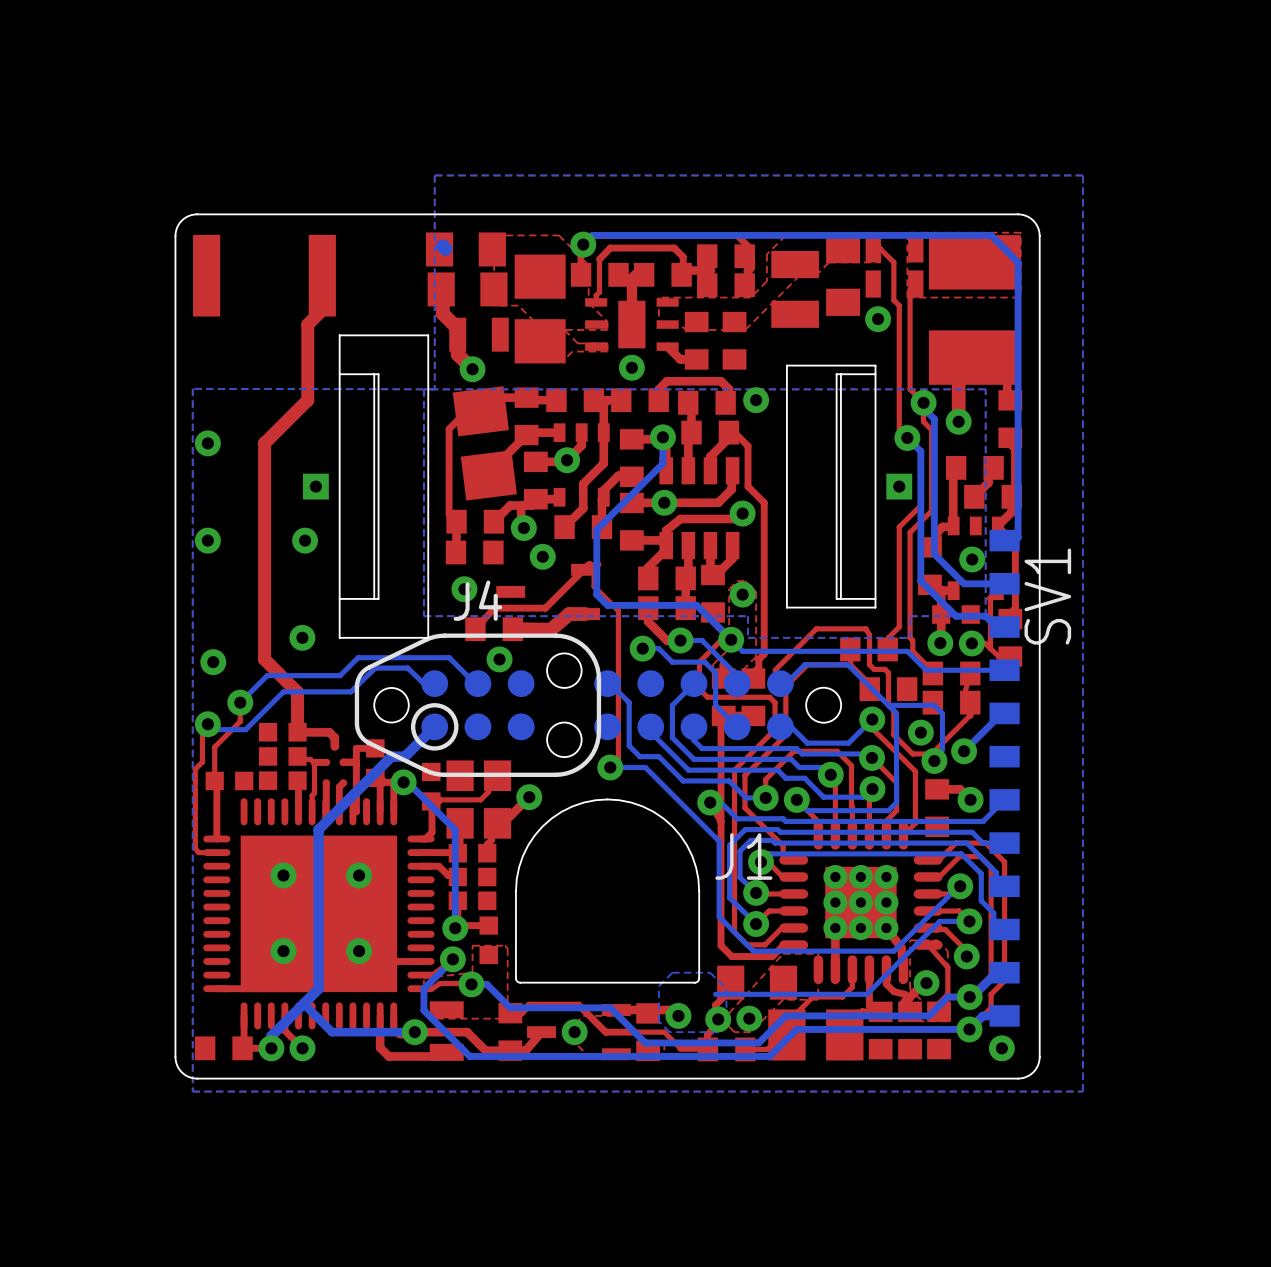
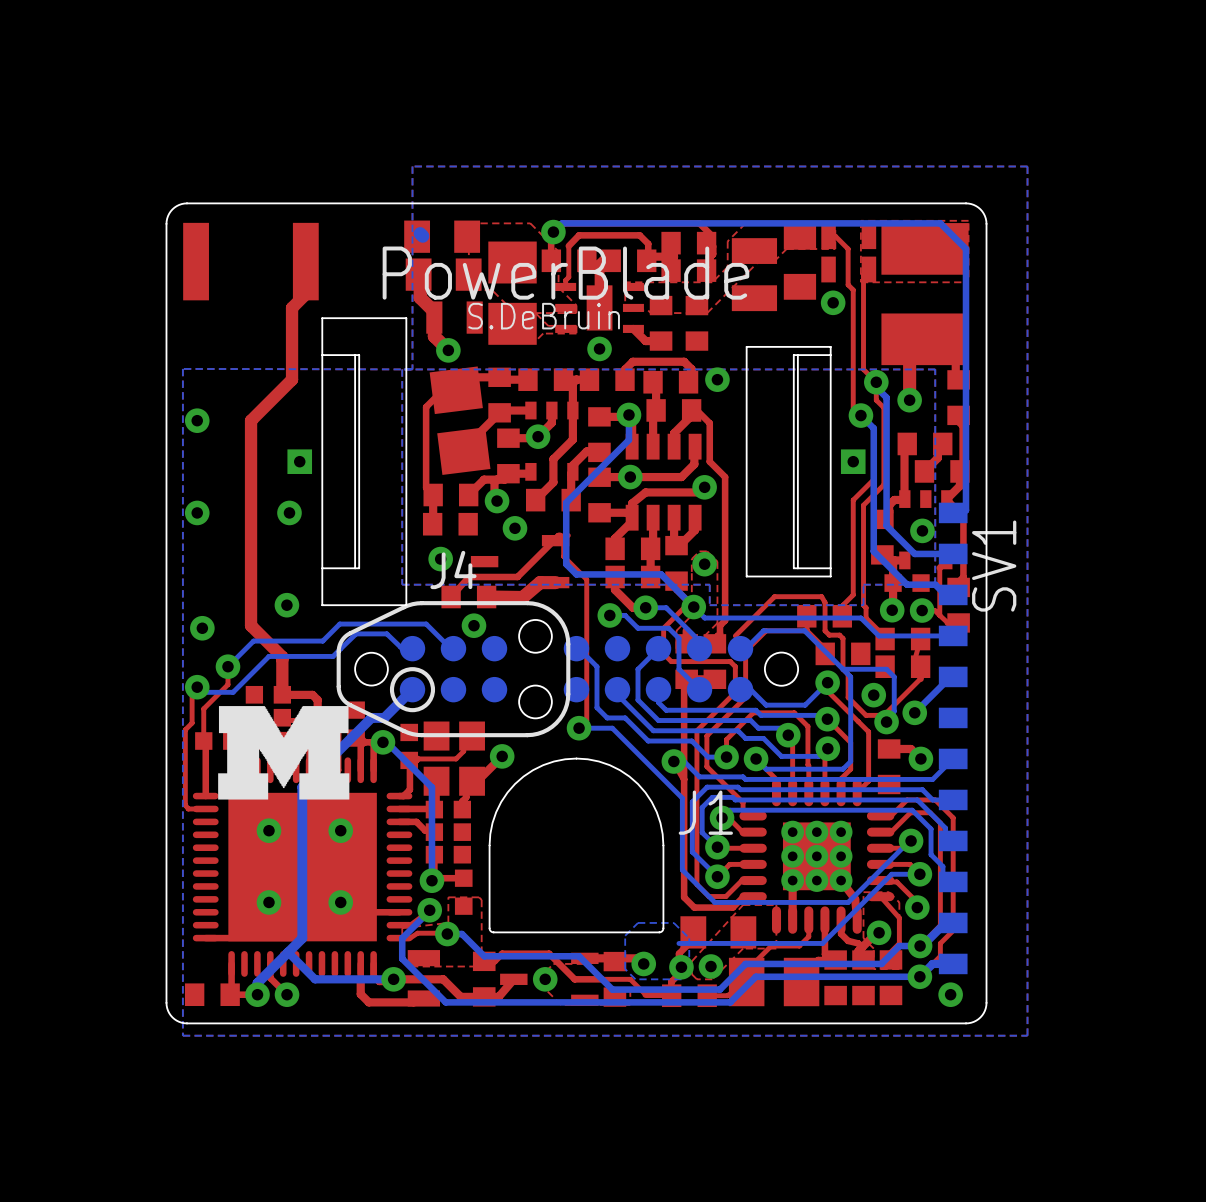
text: none -> PowerBlade (565, 273)
text: none -> S.DeBruin (544, 316)
drawing: none -> [218, 706, 350, 800]

